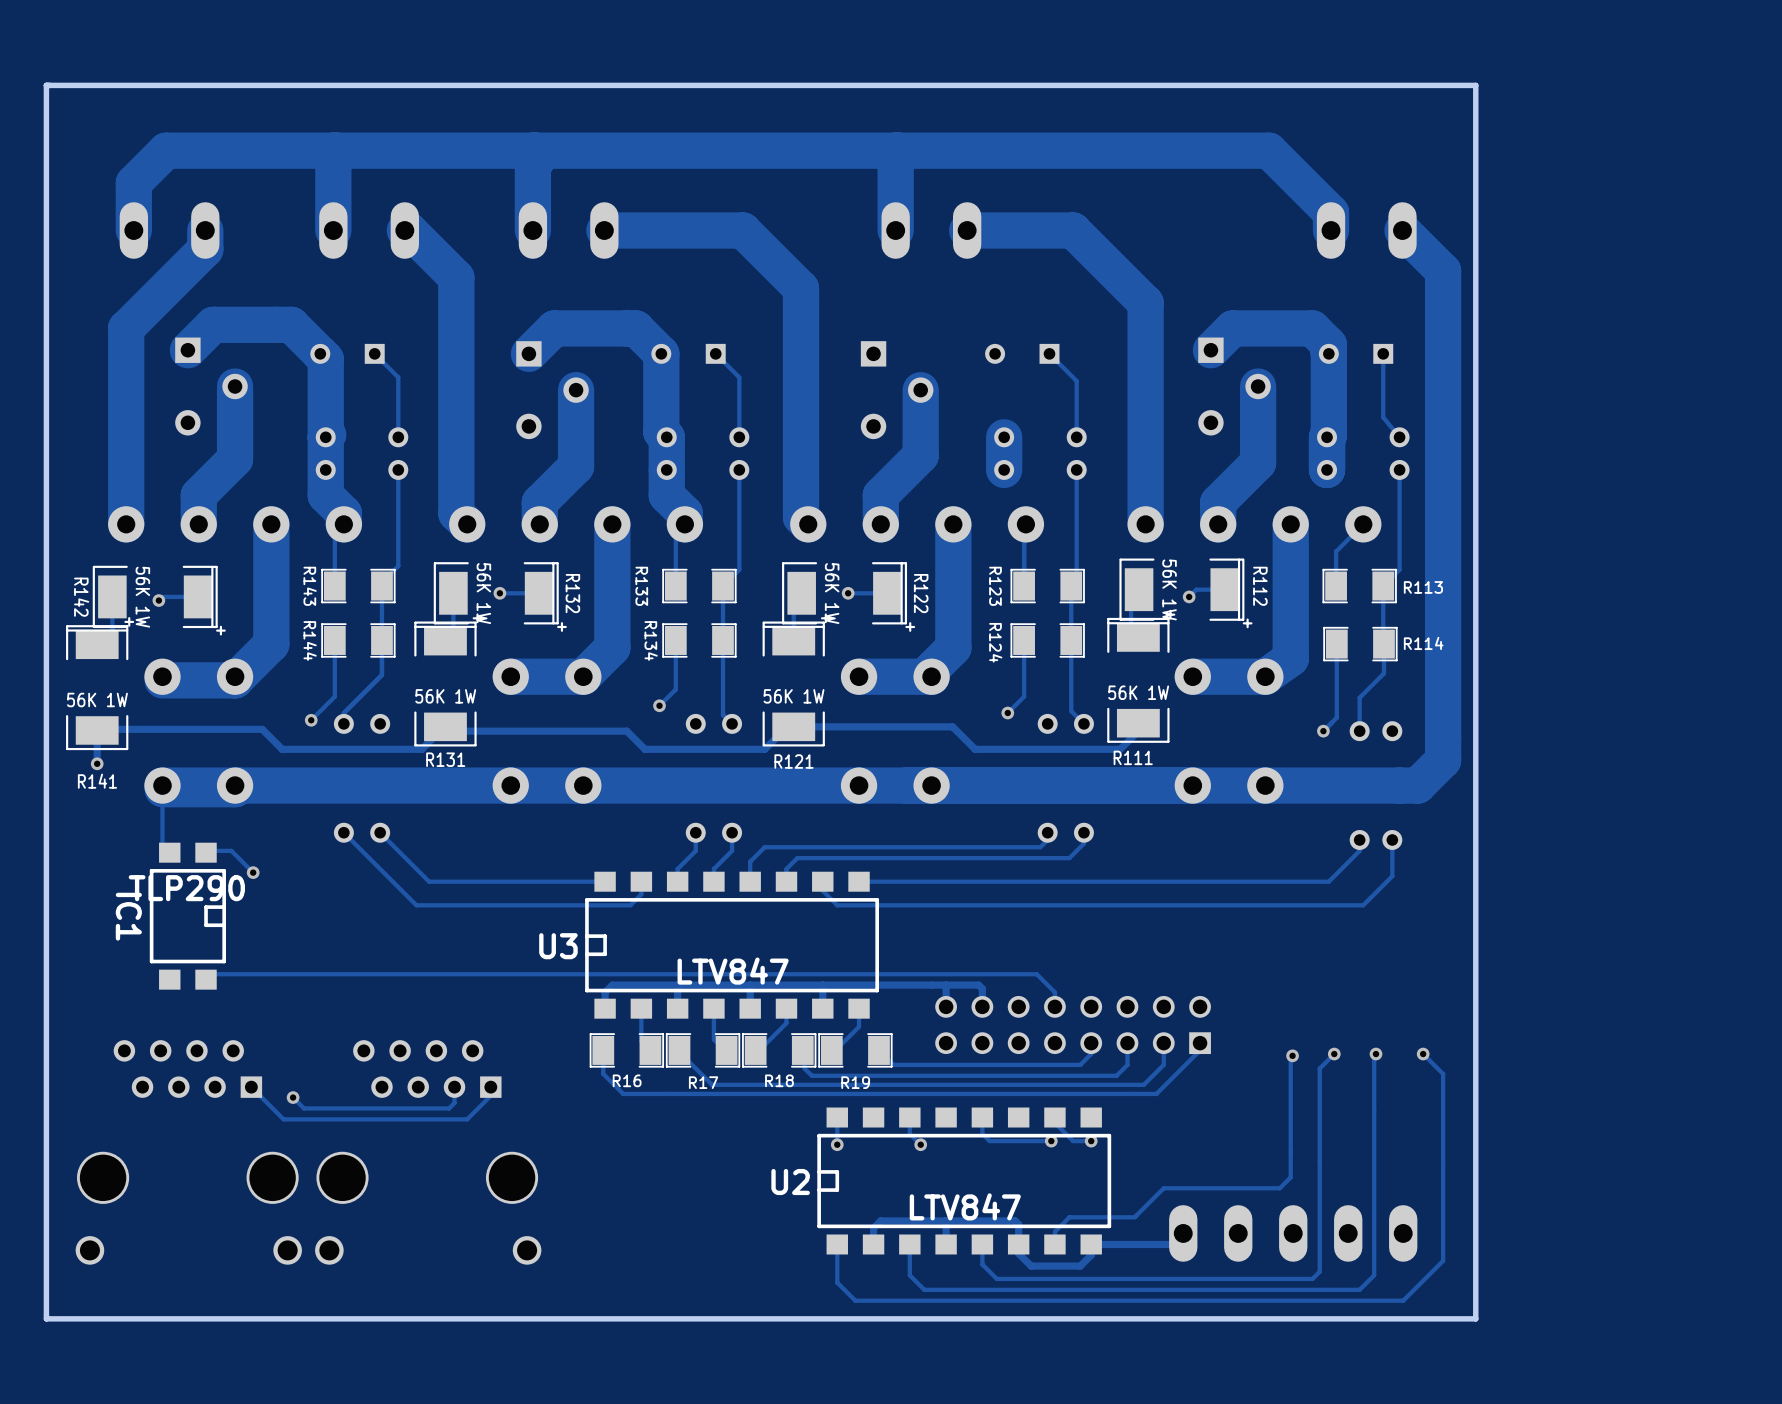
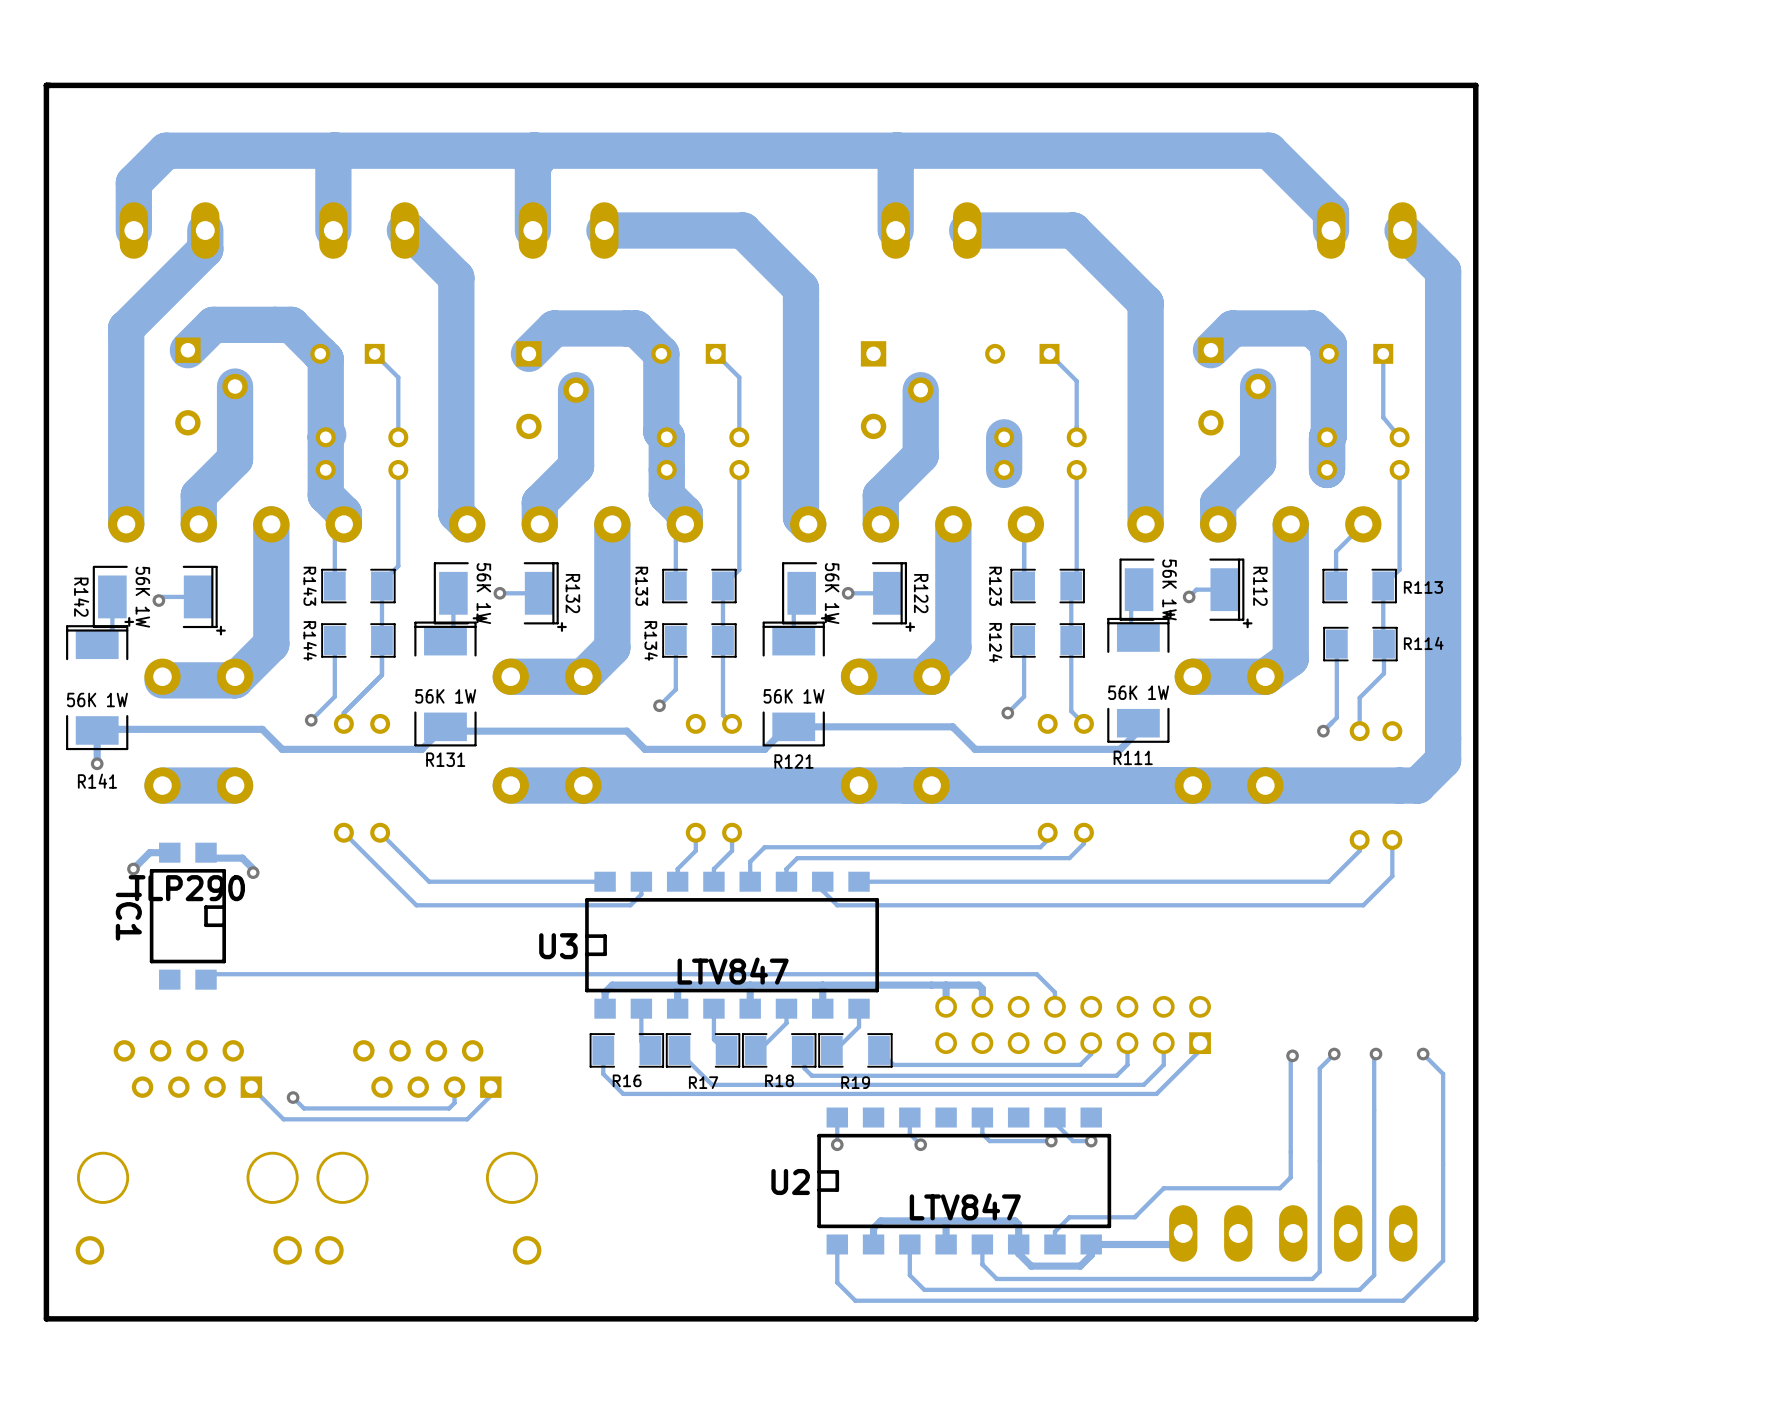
track: (510, 785) (238, 785) (235, 789) (162, 789) (162, 850) -> none
track: (198, 850) (231, 850) (253, 872) -> none
track: none -> (169, 852) (149, 852) (133, 869)
track: none -> (206, 852) (211, 858) (242, 858) (253, 869)
via: none -> (133, 869)

